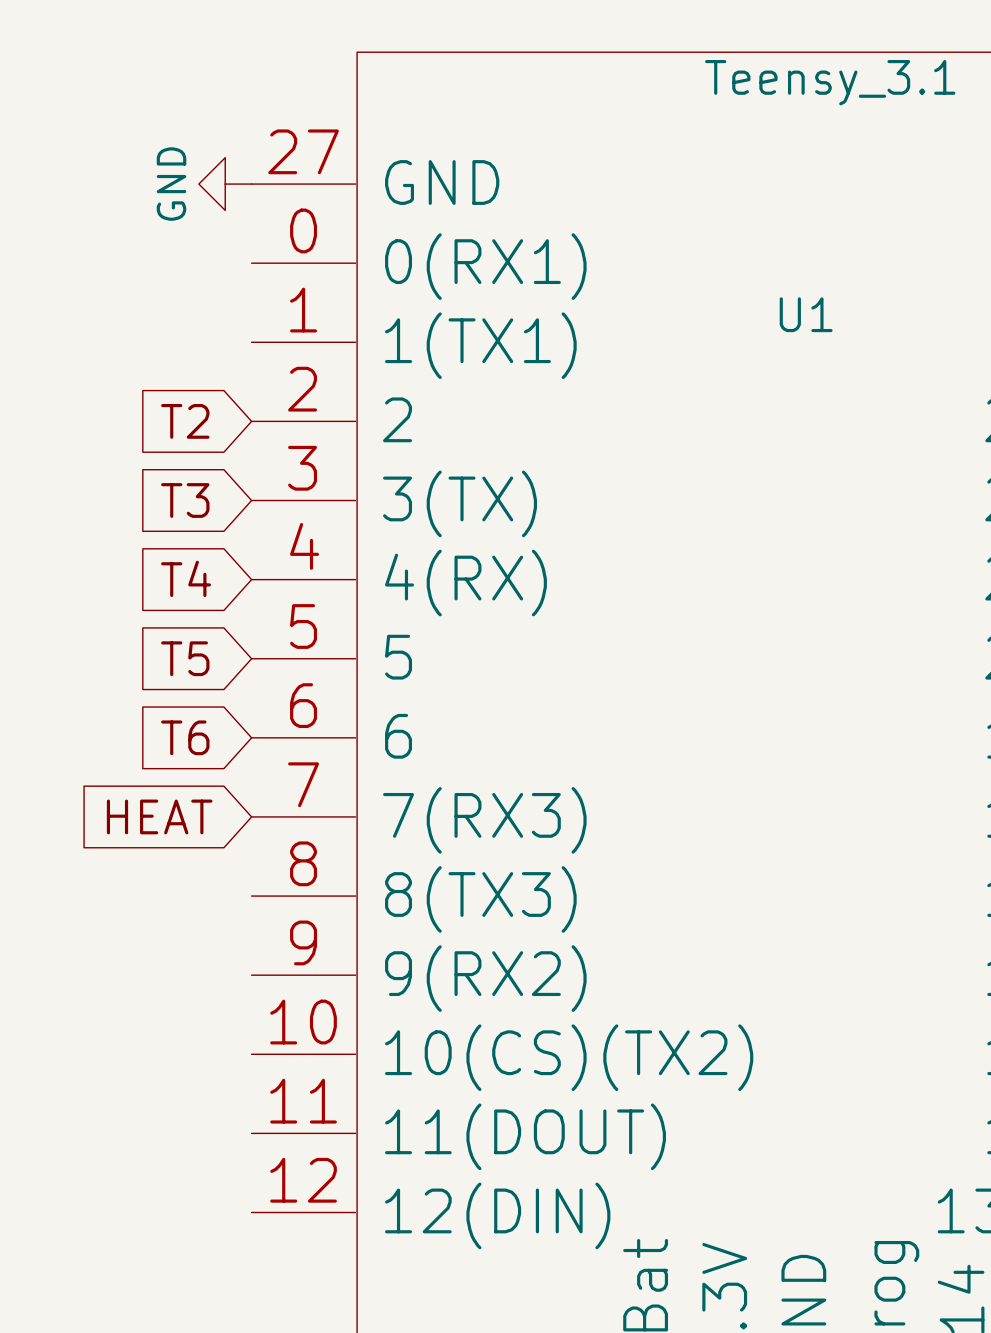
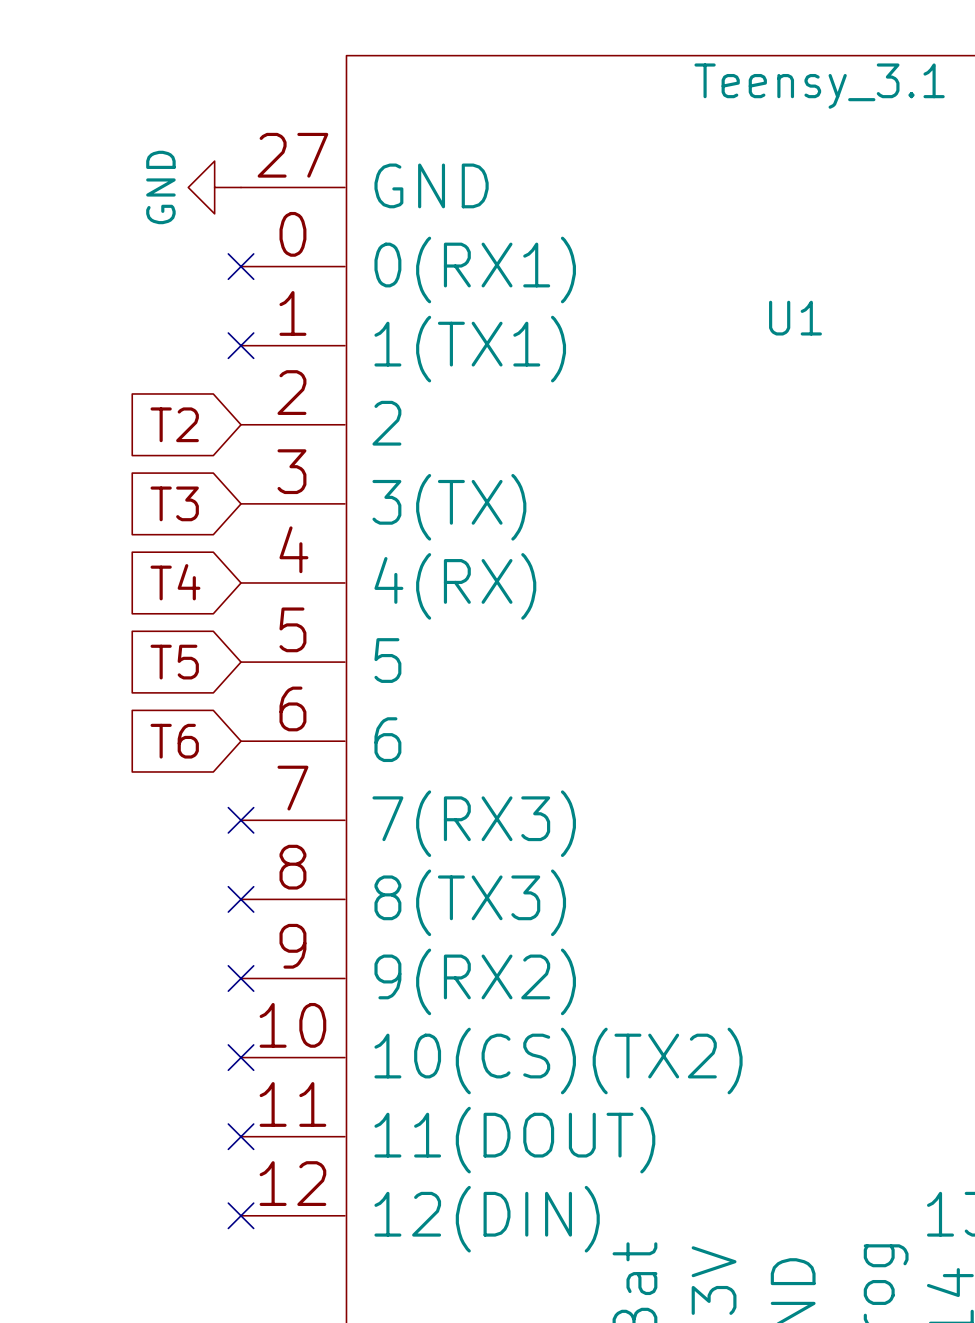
no-connect mark: none -> (241, 266)
no-connect mark: none -> (241, 345)
global label: HEAT (159, 816) -> none
no-connect mark: none -> (241, 820)
no-connect mark: none -> (241, 899)
no-connect mark: none -> (241, 978)
no-connect mark: none -> (241, 1057)
no-connect mark: none -> (241, 1136)
no-connect mark: none -> (241, 1215)

